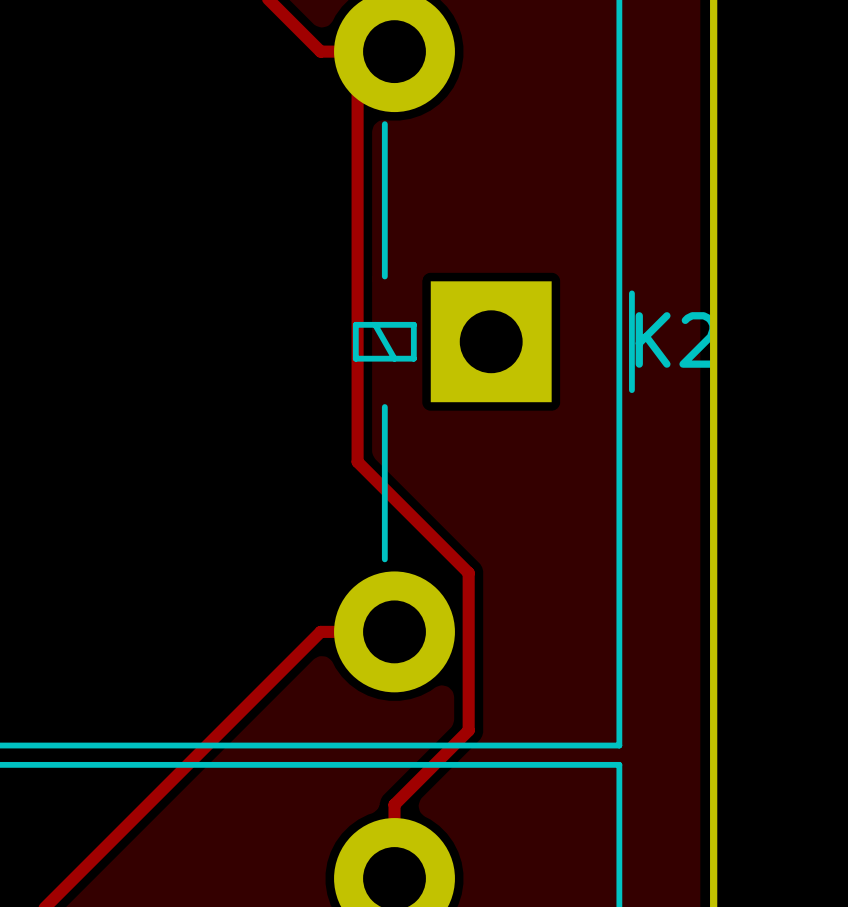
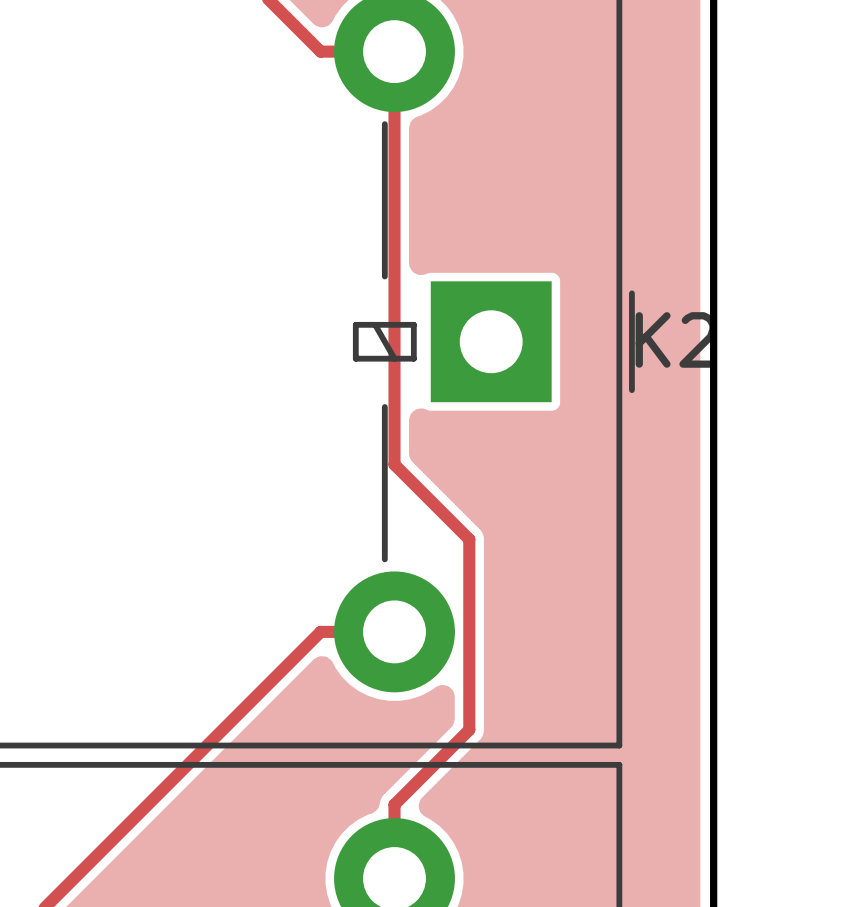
track: (357, 51) (357, 461) (468, 573) (468, 730) -> (394, 51) (394, 464) (469, 539) (469, 729)

